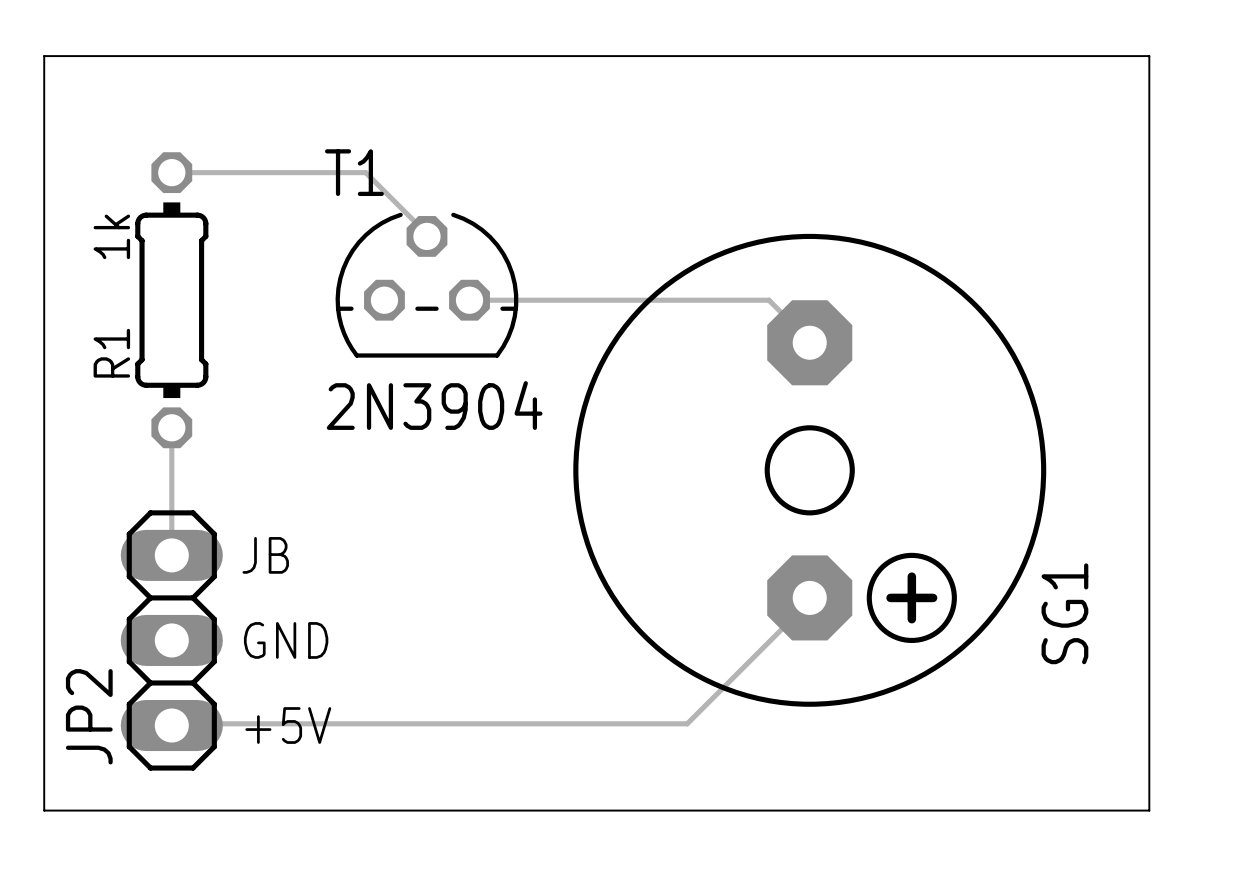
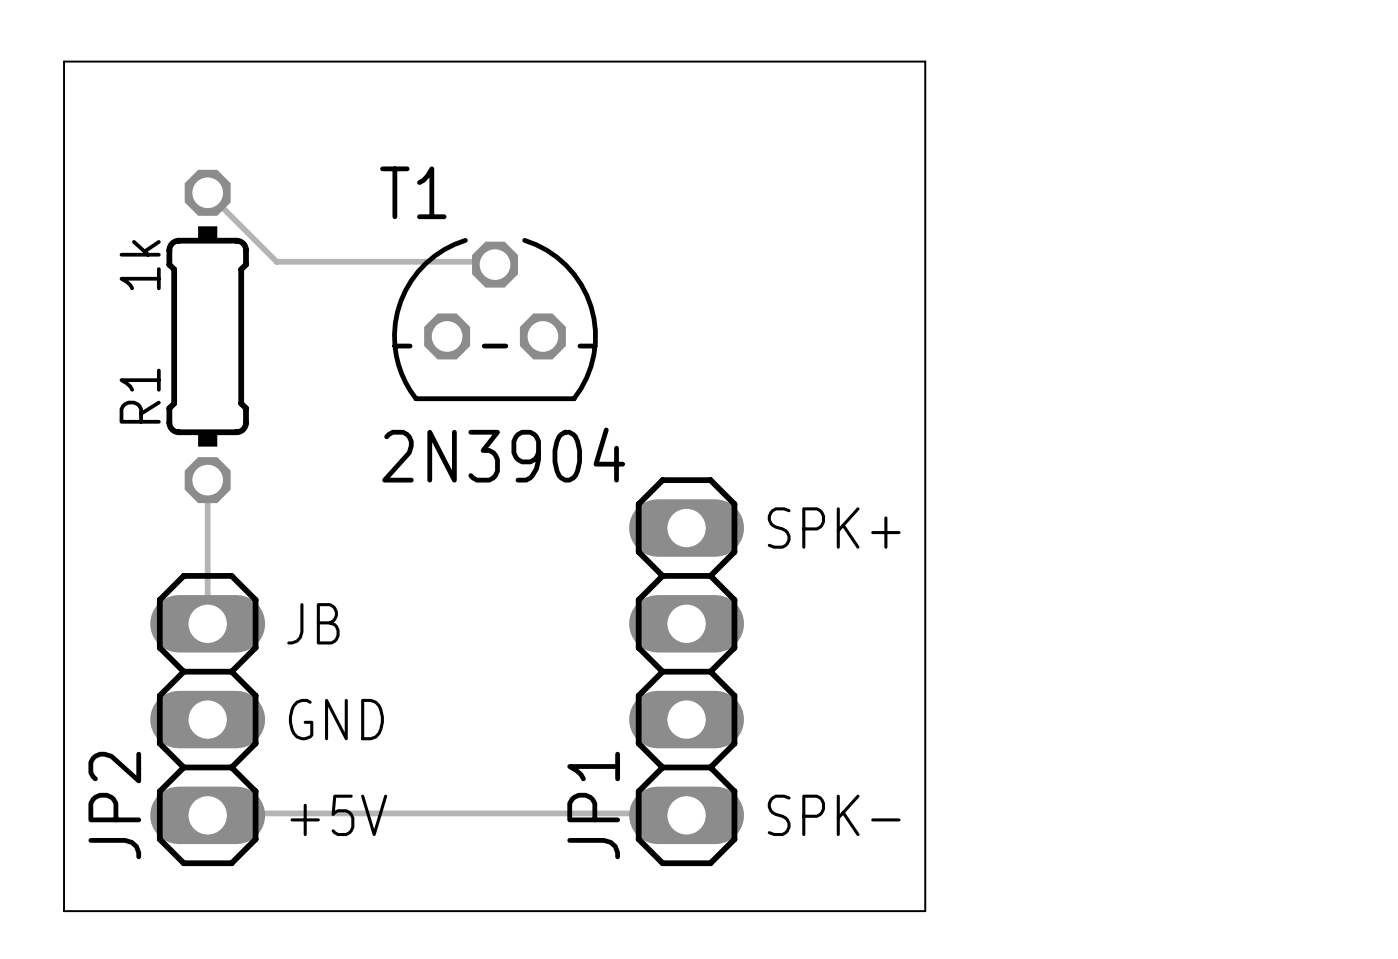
board edge: (809, 56) (1149, 56) (1149, 810) (809, 810) -> (925, 61) (925, 911)
track: (171, 172) (365, 172) (426, 233) -> (207, 192) (276, 261) (495, 261)
track: (469, 300) (768, 300) (809, 342) -> none
text: none -> SPK+ (834, 528)
SG1: (809, 470) -> none
JP1: none -> (686, 671)
track: (809, 597) (809, 601) (687, 723) (595, 723) -> none
text: none -> SPK- (834, 815)

